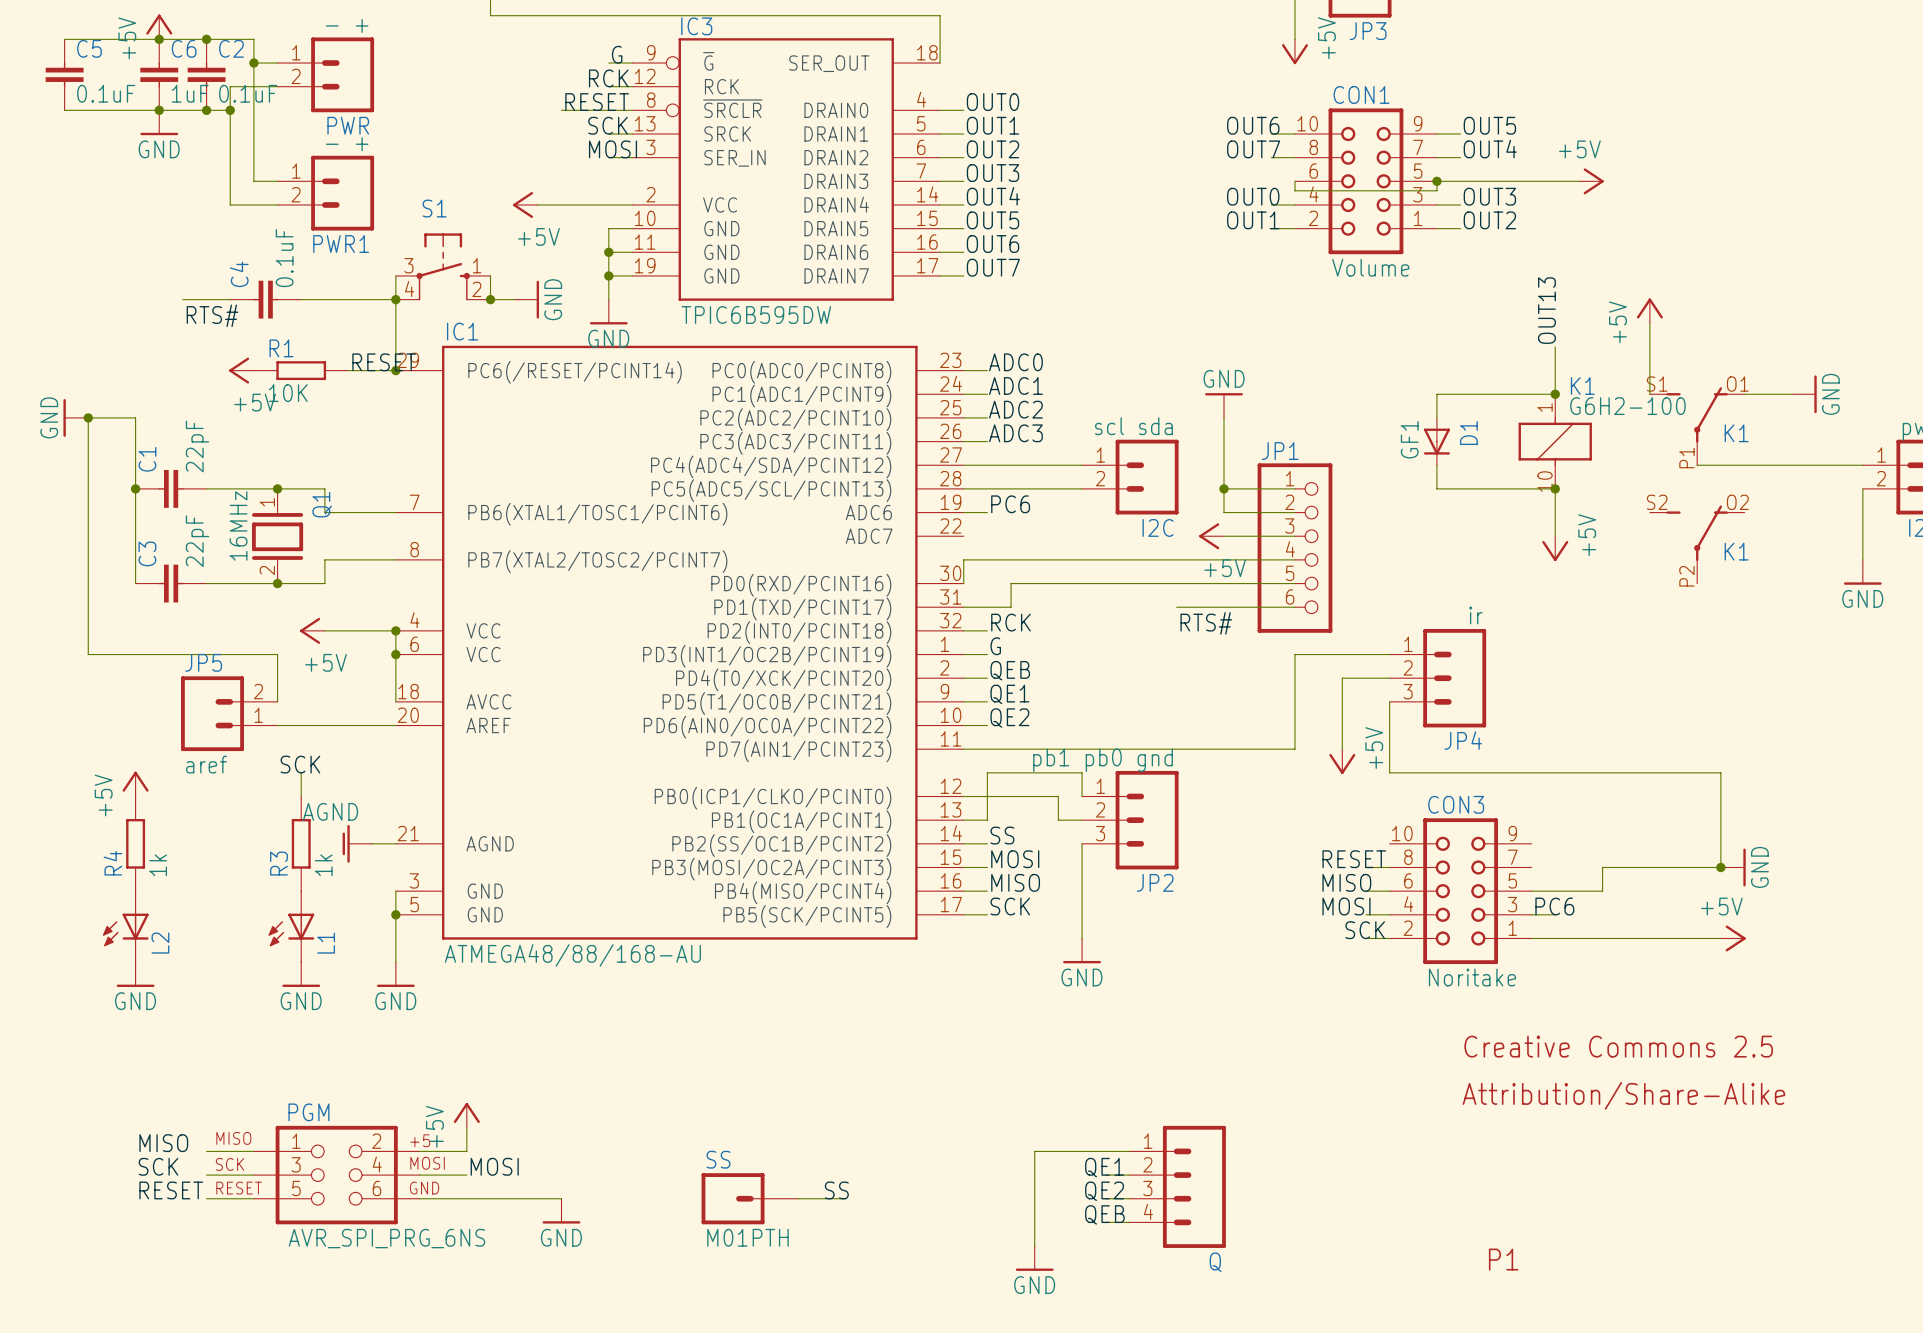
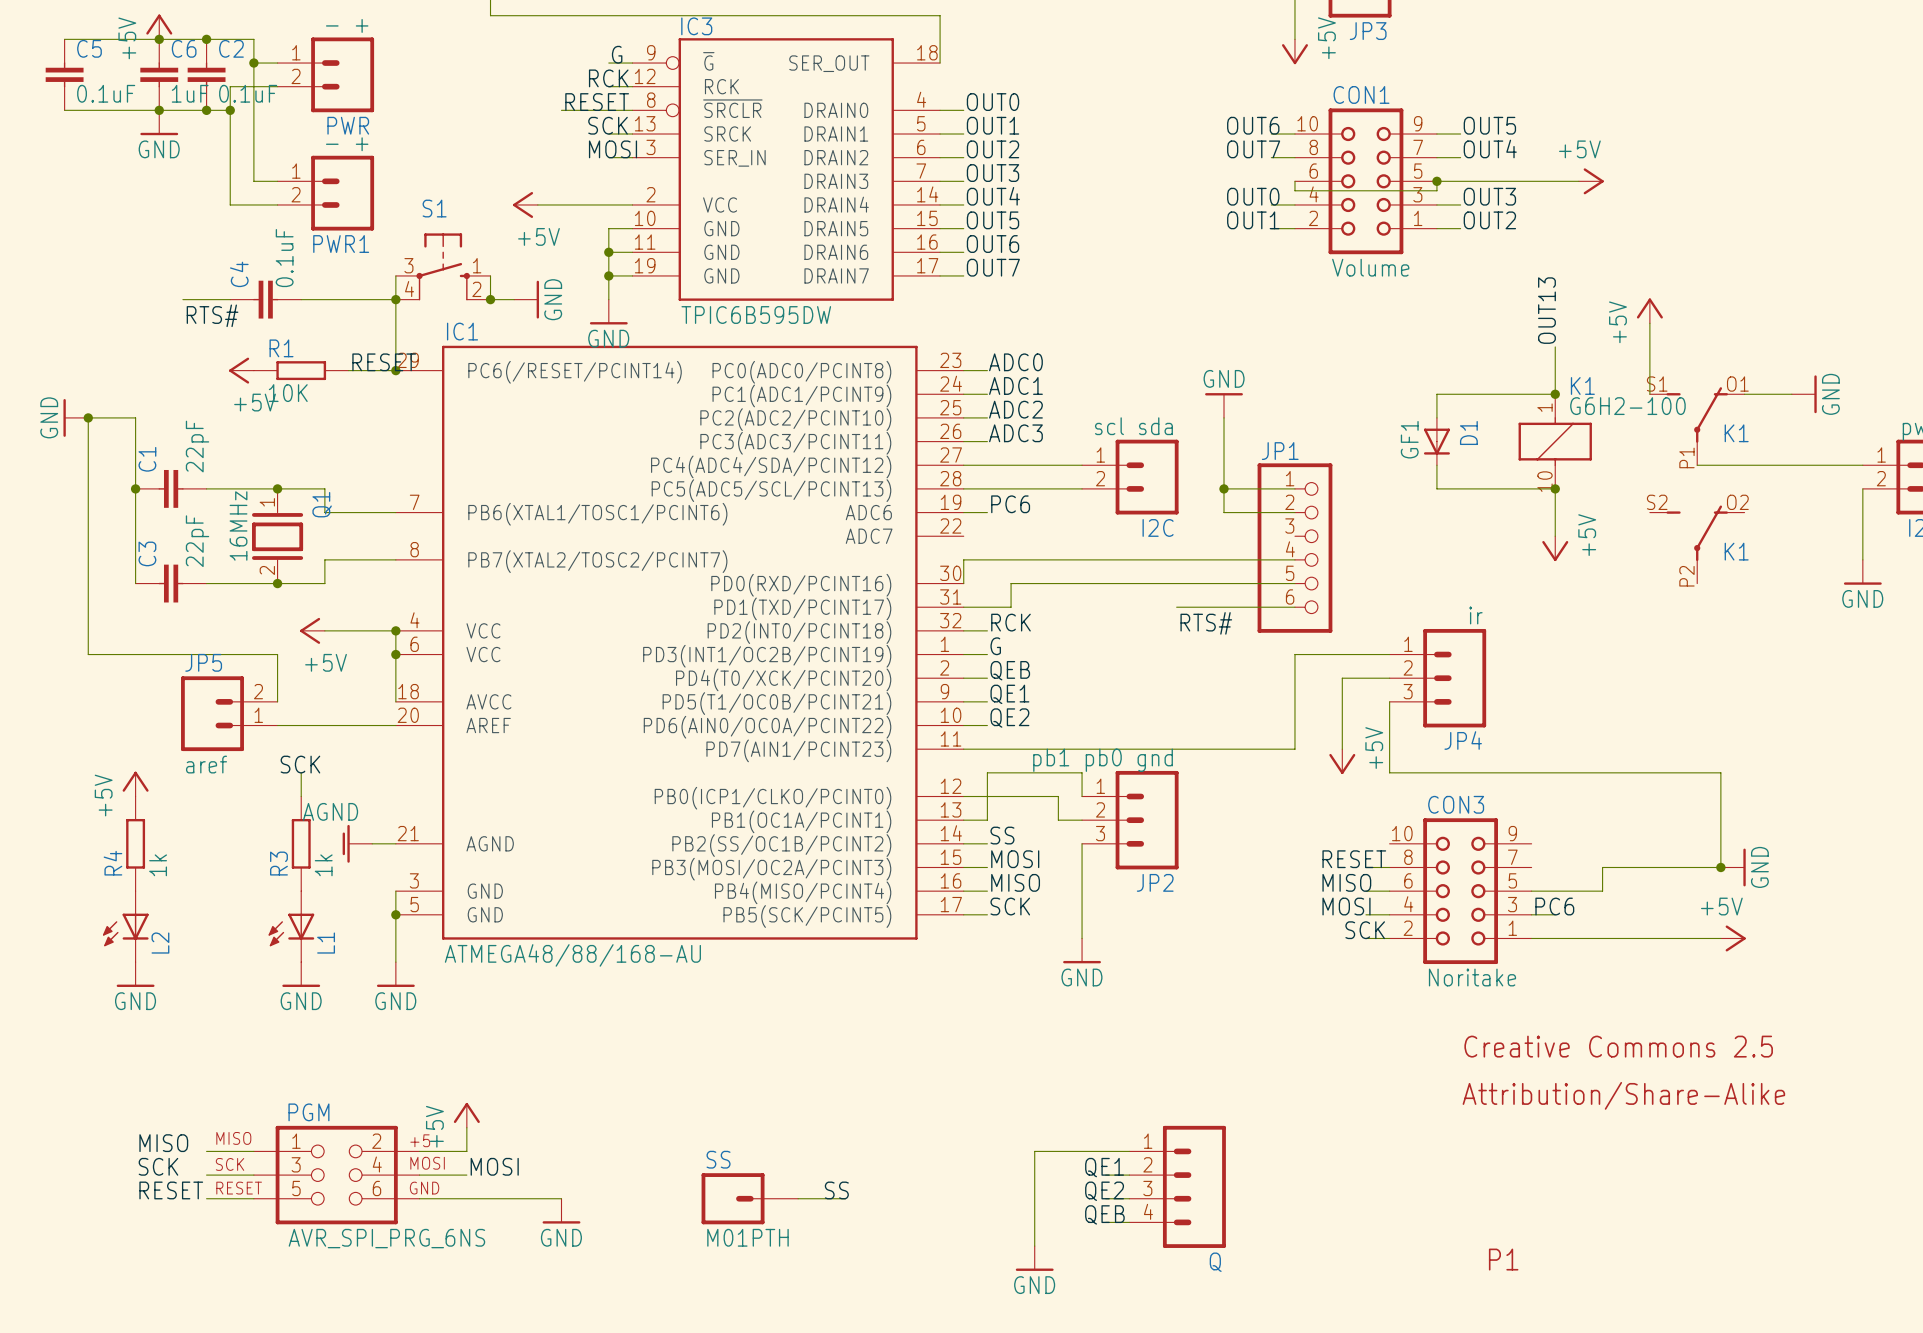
power symbol: +5V (1211, 536) -> none
wire: (1224, 536) (1294, 536) -> none

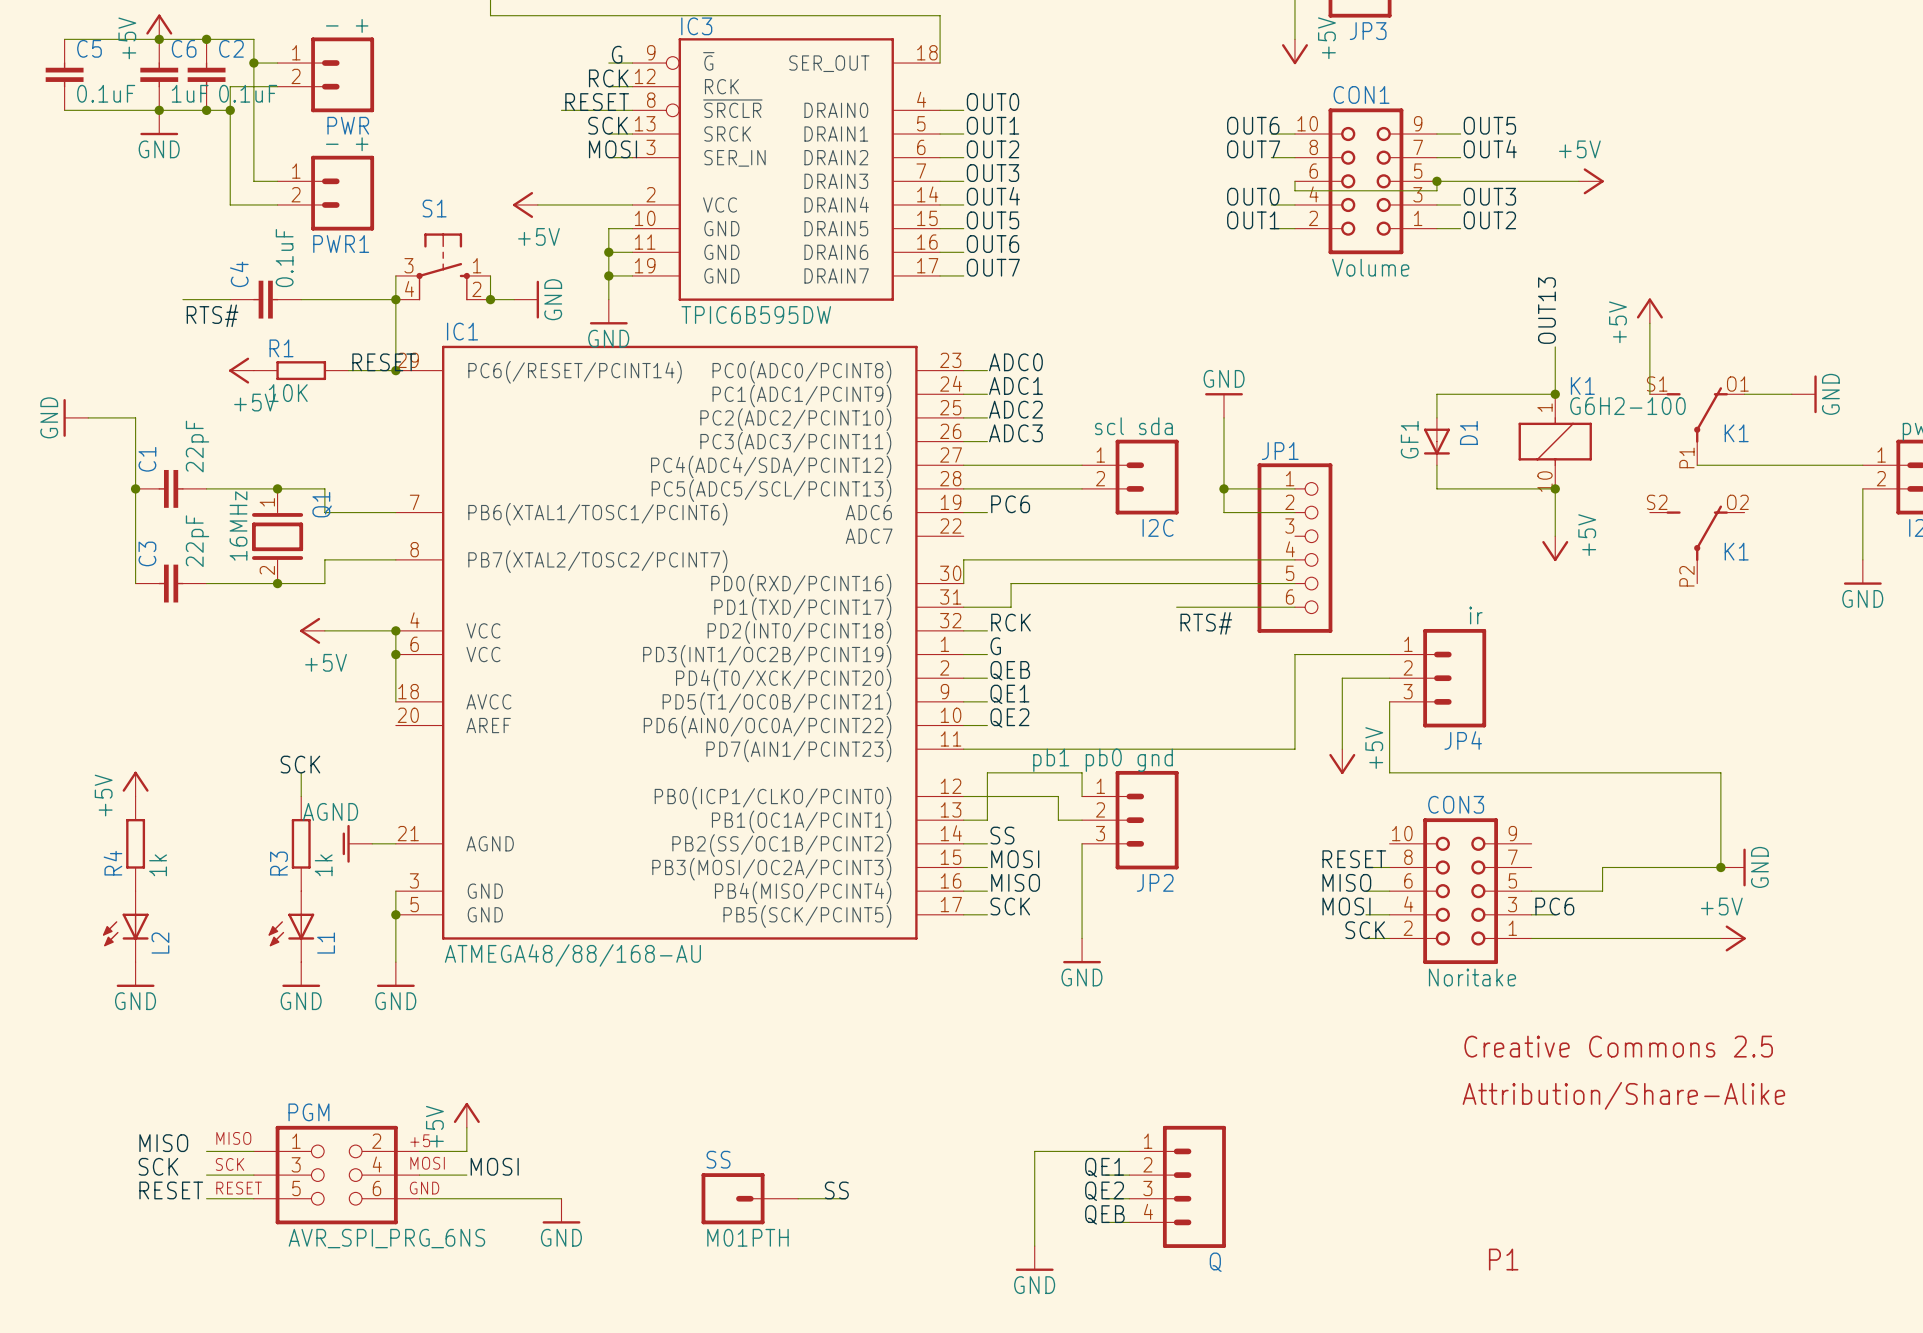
wire: (88, 417) (88, 654) (277, 654) (277, 701) -> none
junction: (88, 417) -> none
JP5: aref (229, 713) -> none
wire: (277, 725) (395, 725) -> none

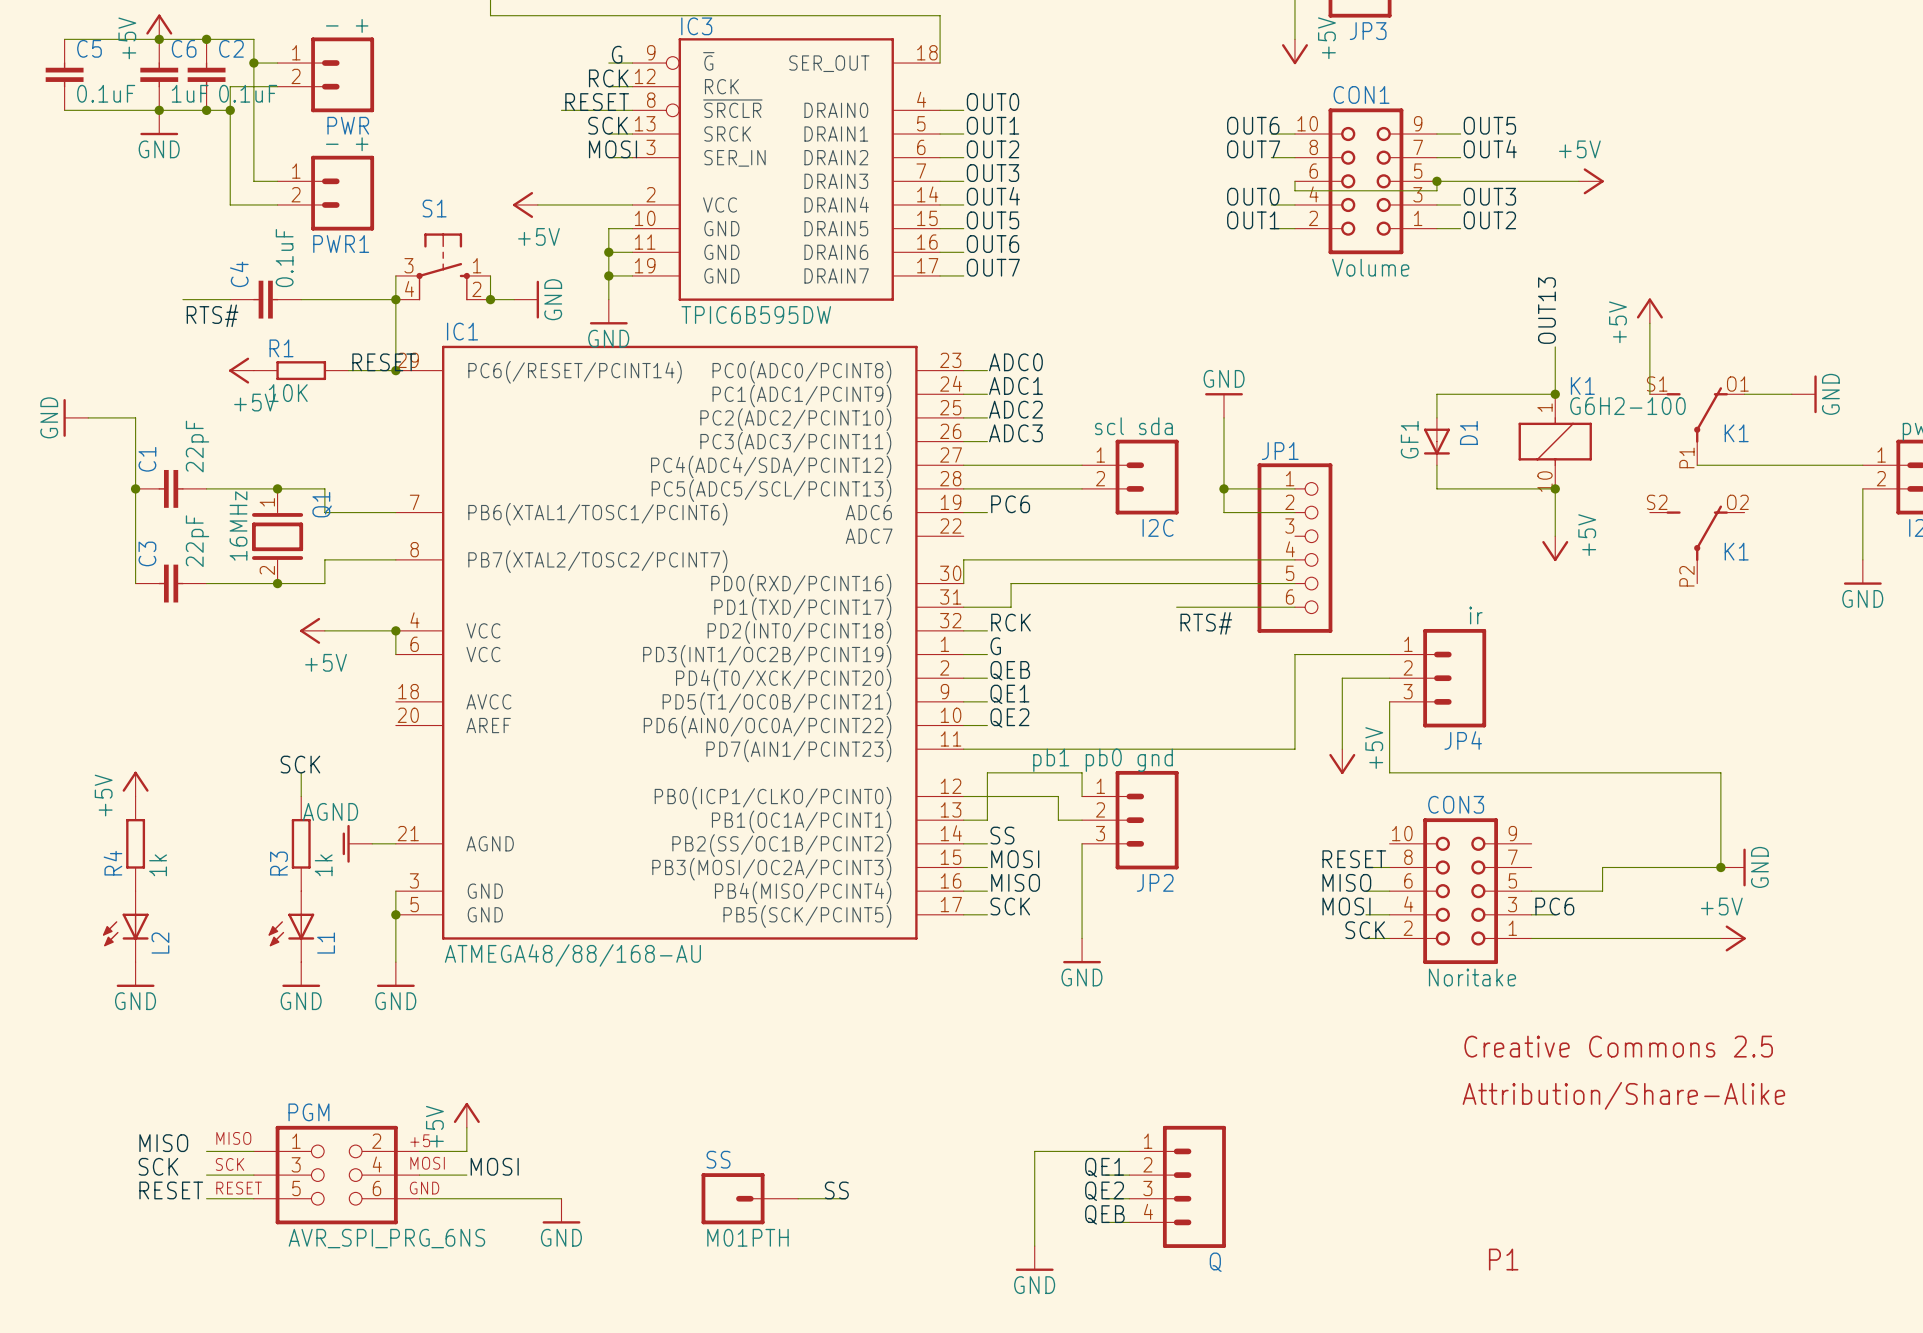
wire: (395, 654) (395, 701) -> none
junction: (395, 654) -> none

